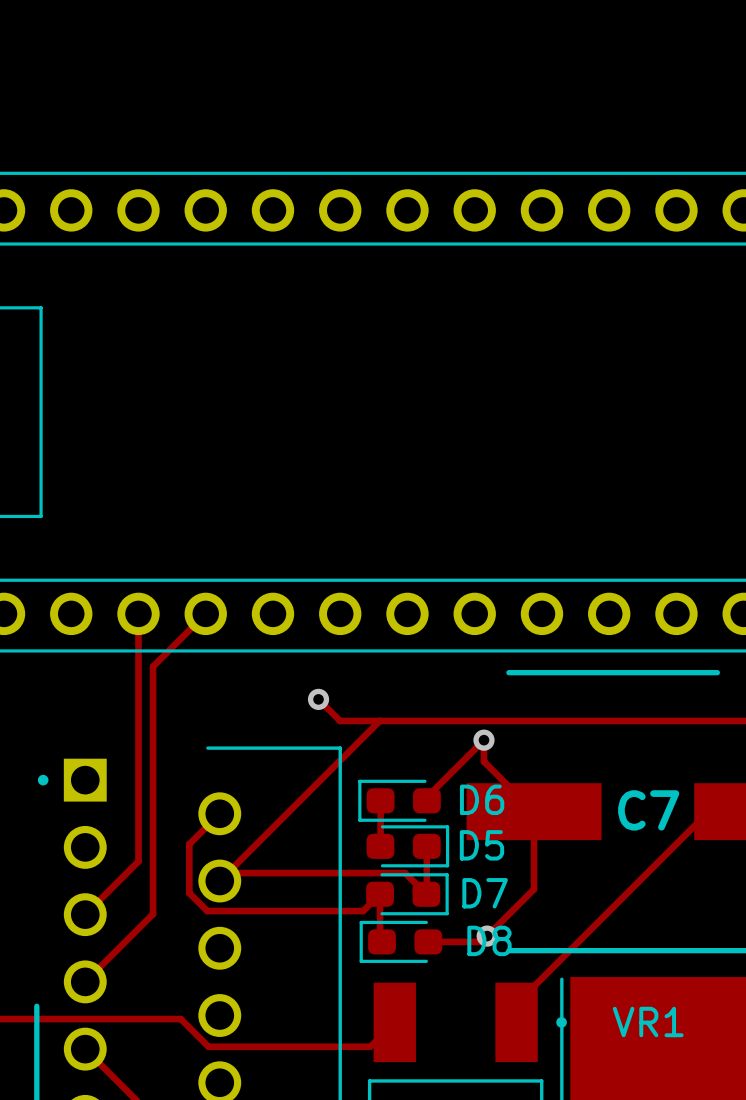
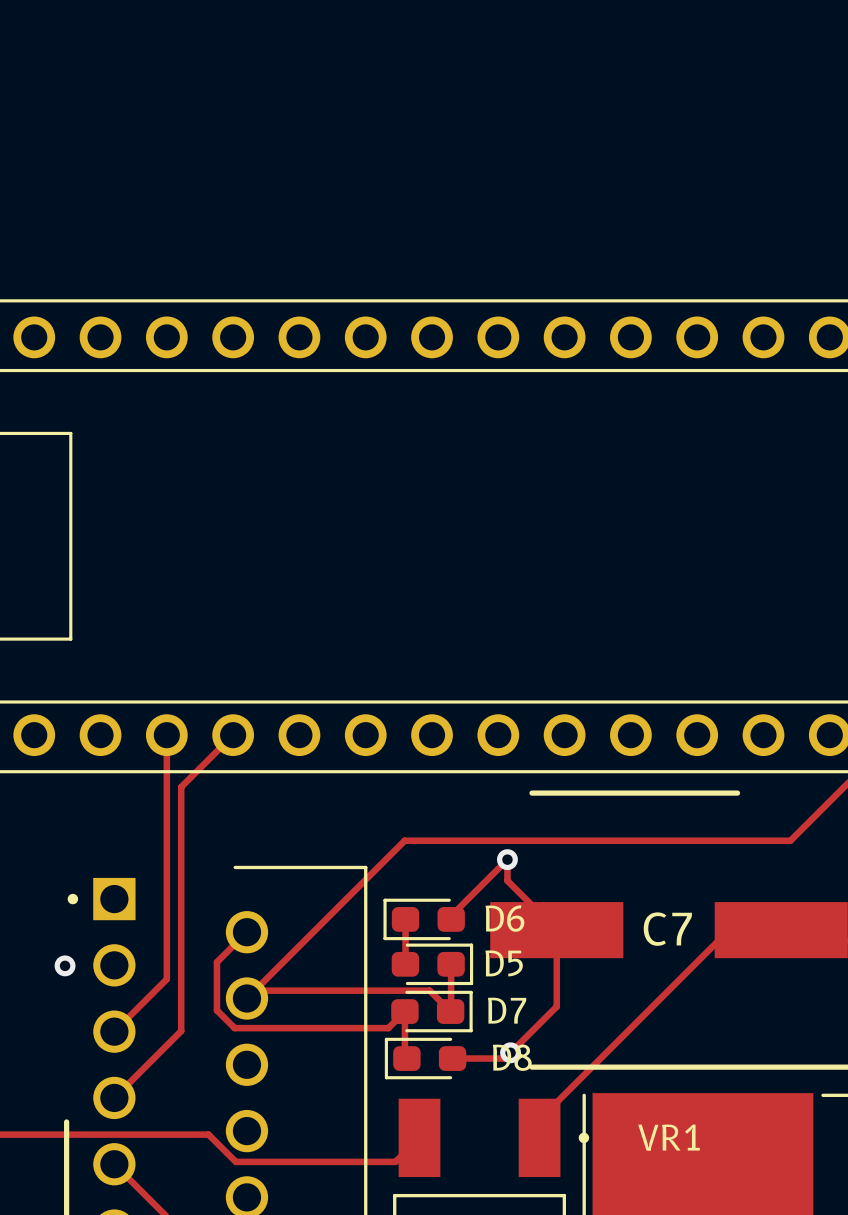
track: (318, 699) (340, 720) (379, 720) -> none
via: (318, 699) -> none
via: none -> (65, 965)

